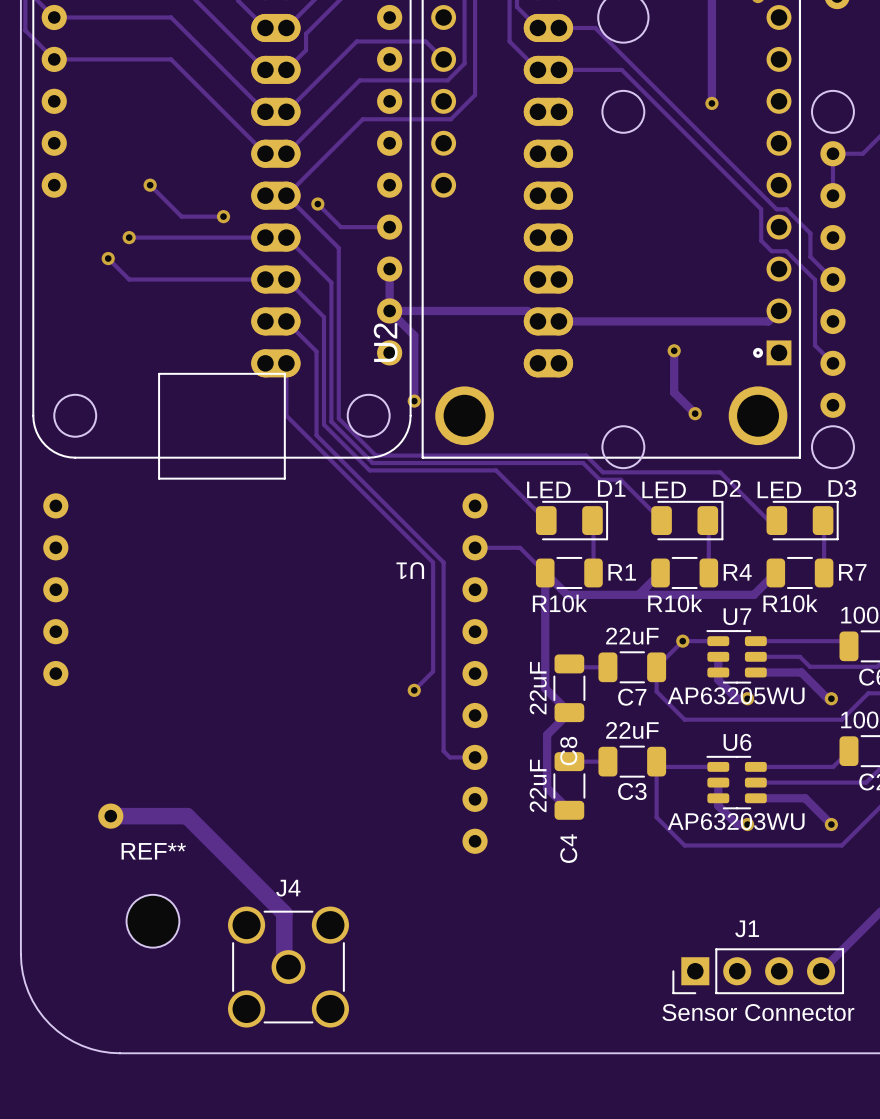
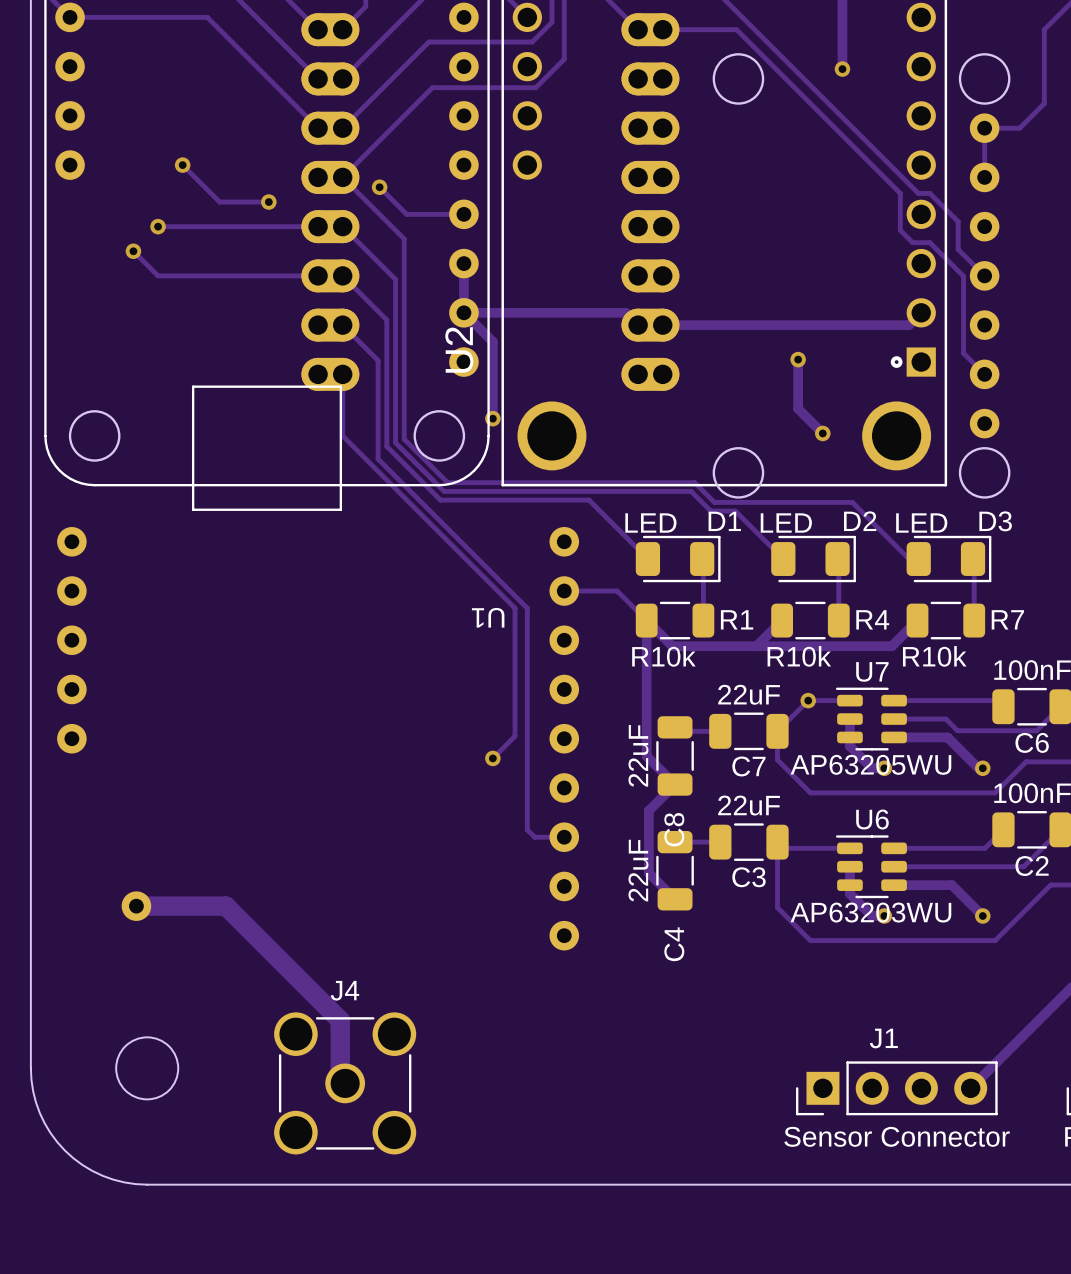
REF**: (152, 921) -> none
round board edge: none -> [115, 1036, 180, 1101]

